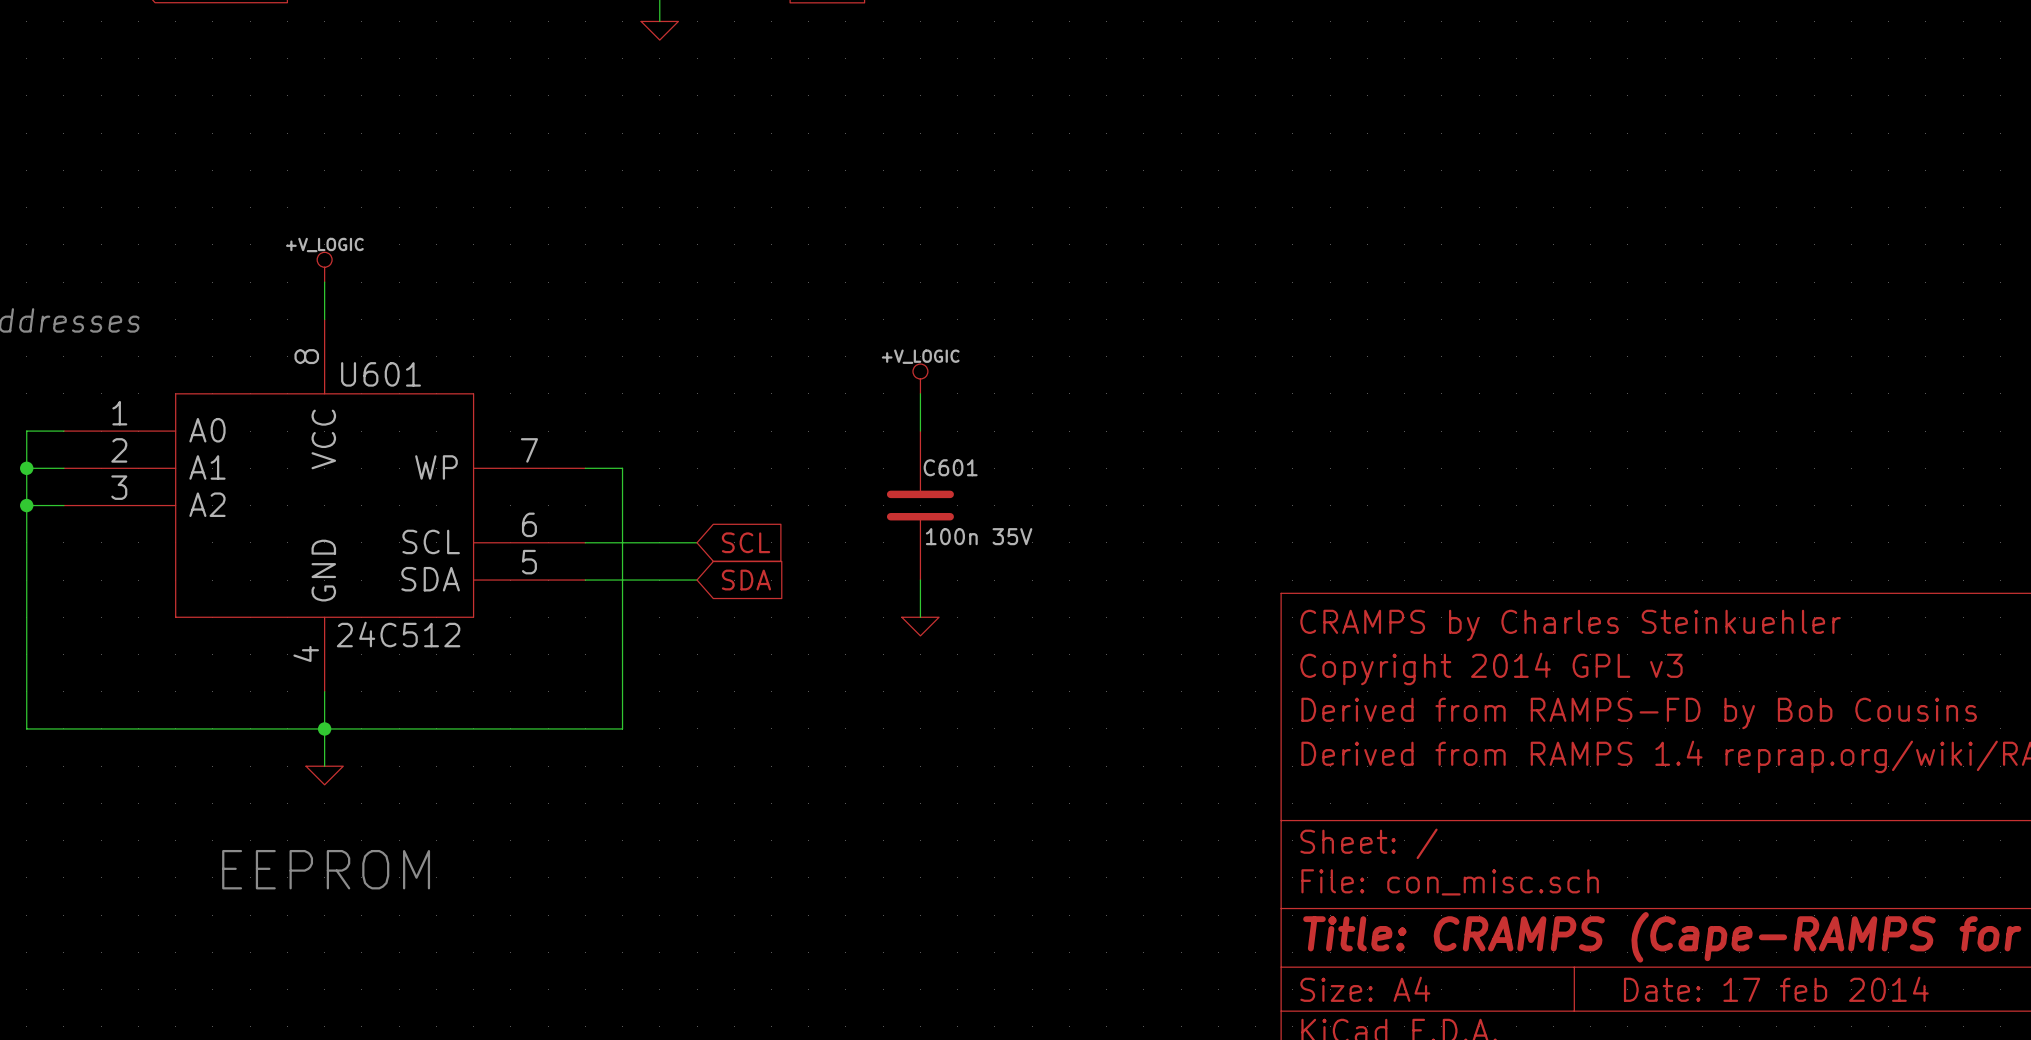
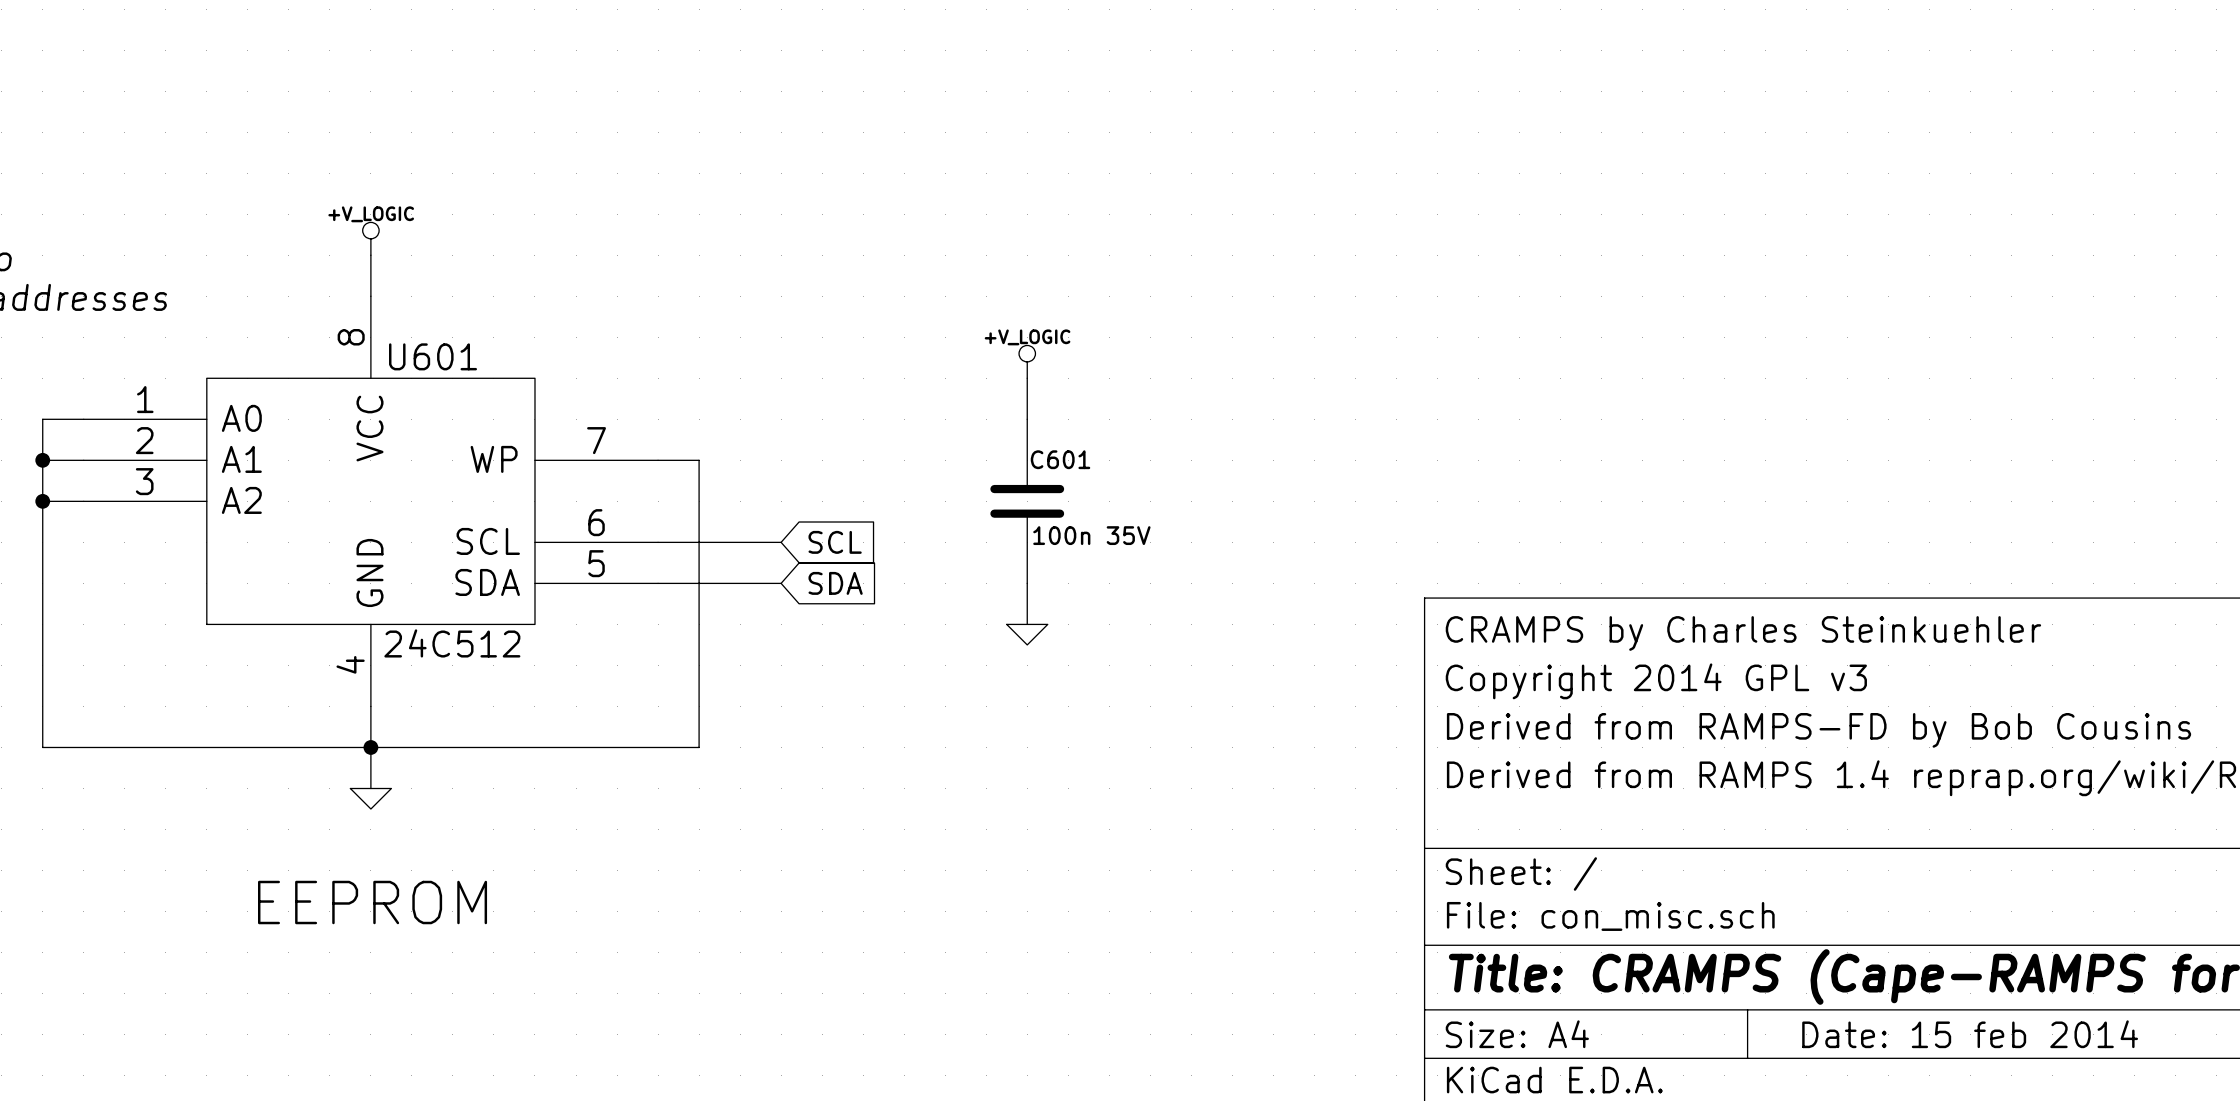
title block: Date: 17 feb 2014 (1776, 989) -> Date: 15 feb 2014 (1970, 1034)

